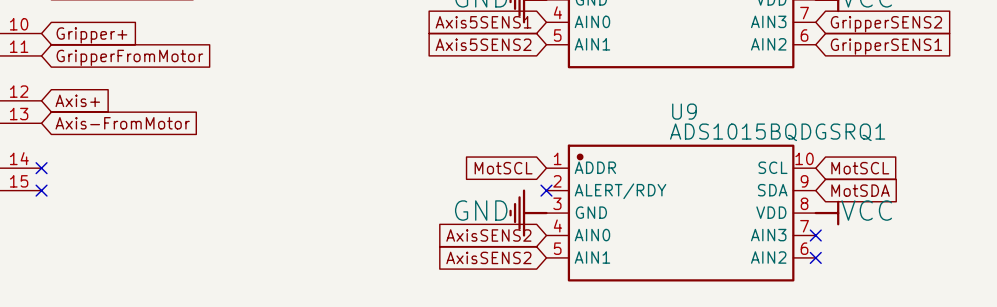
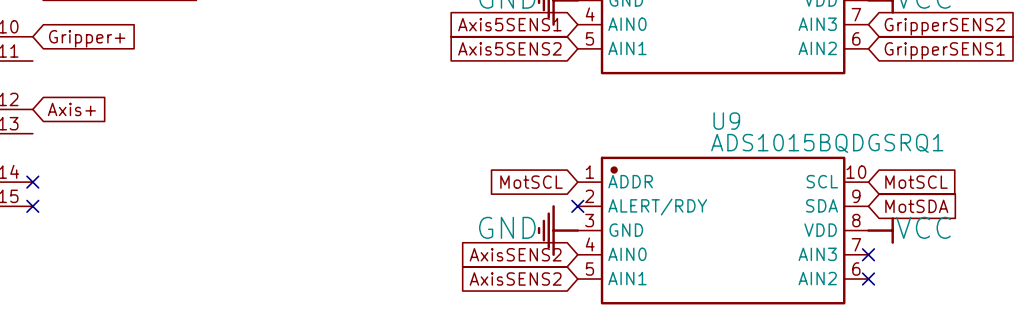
global label: GripperFromMotor (129, 57) -> none
global label: Axis-FromMotor (122, 123) -> none

